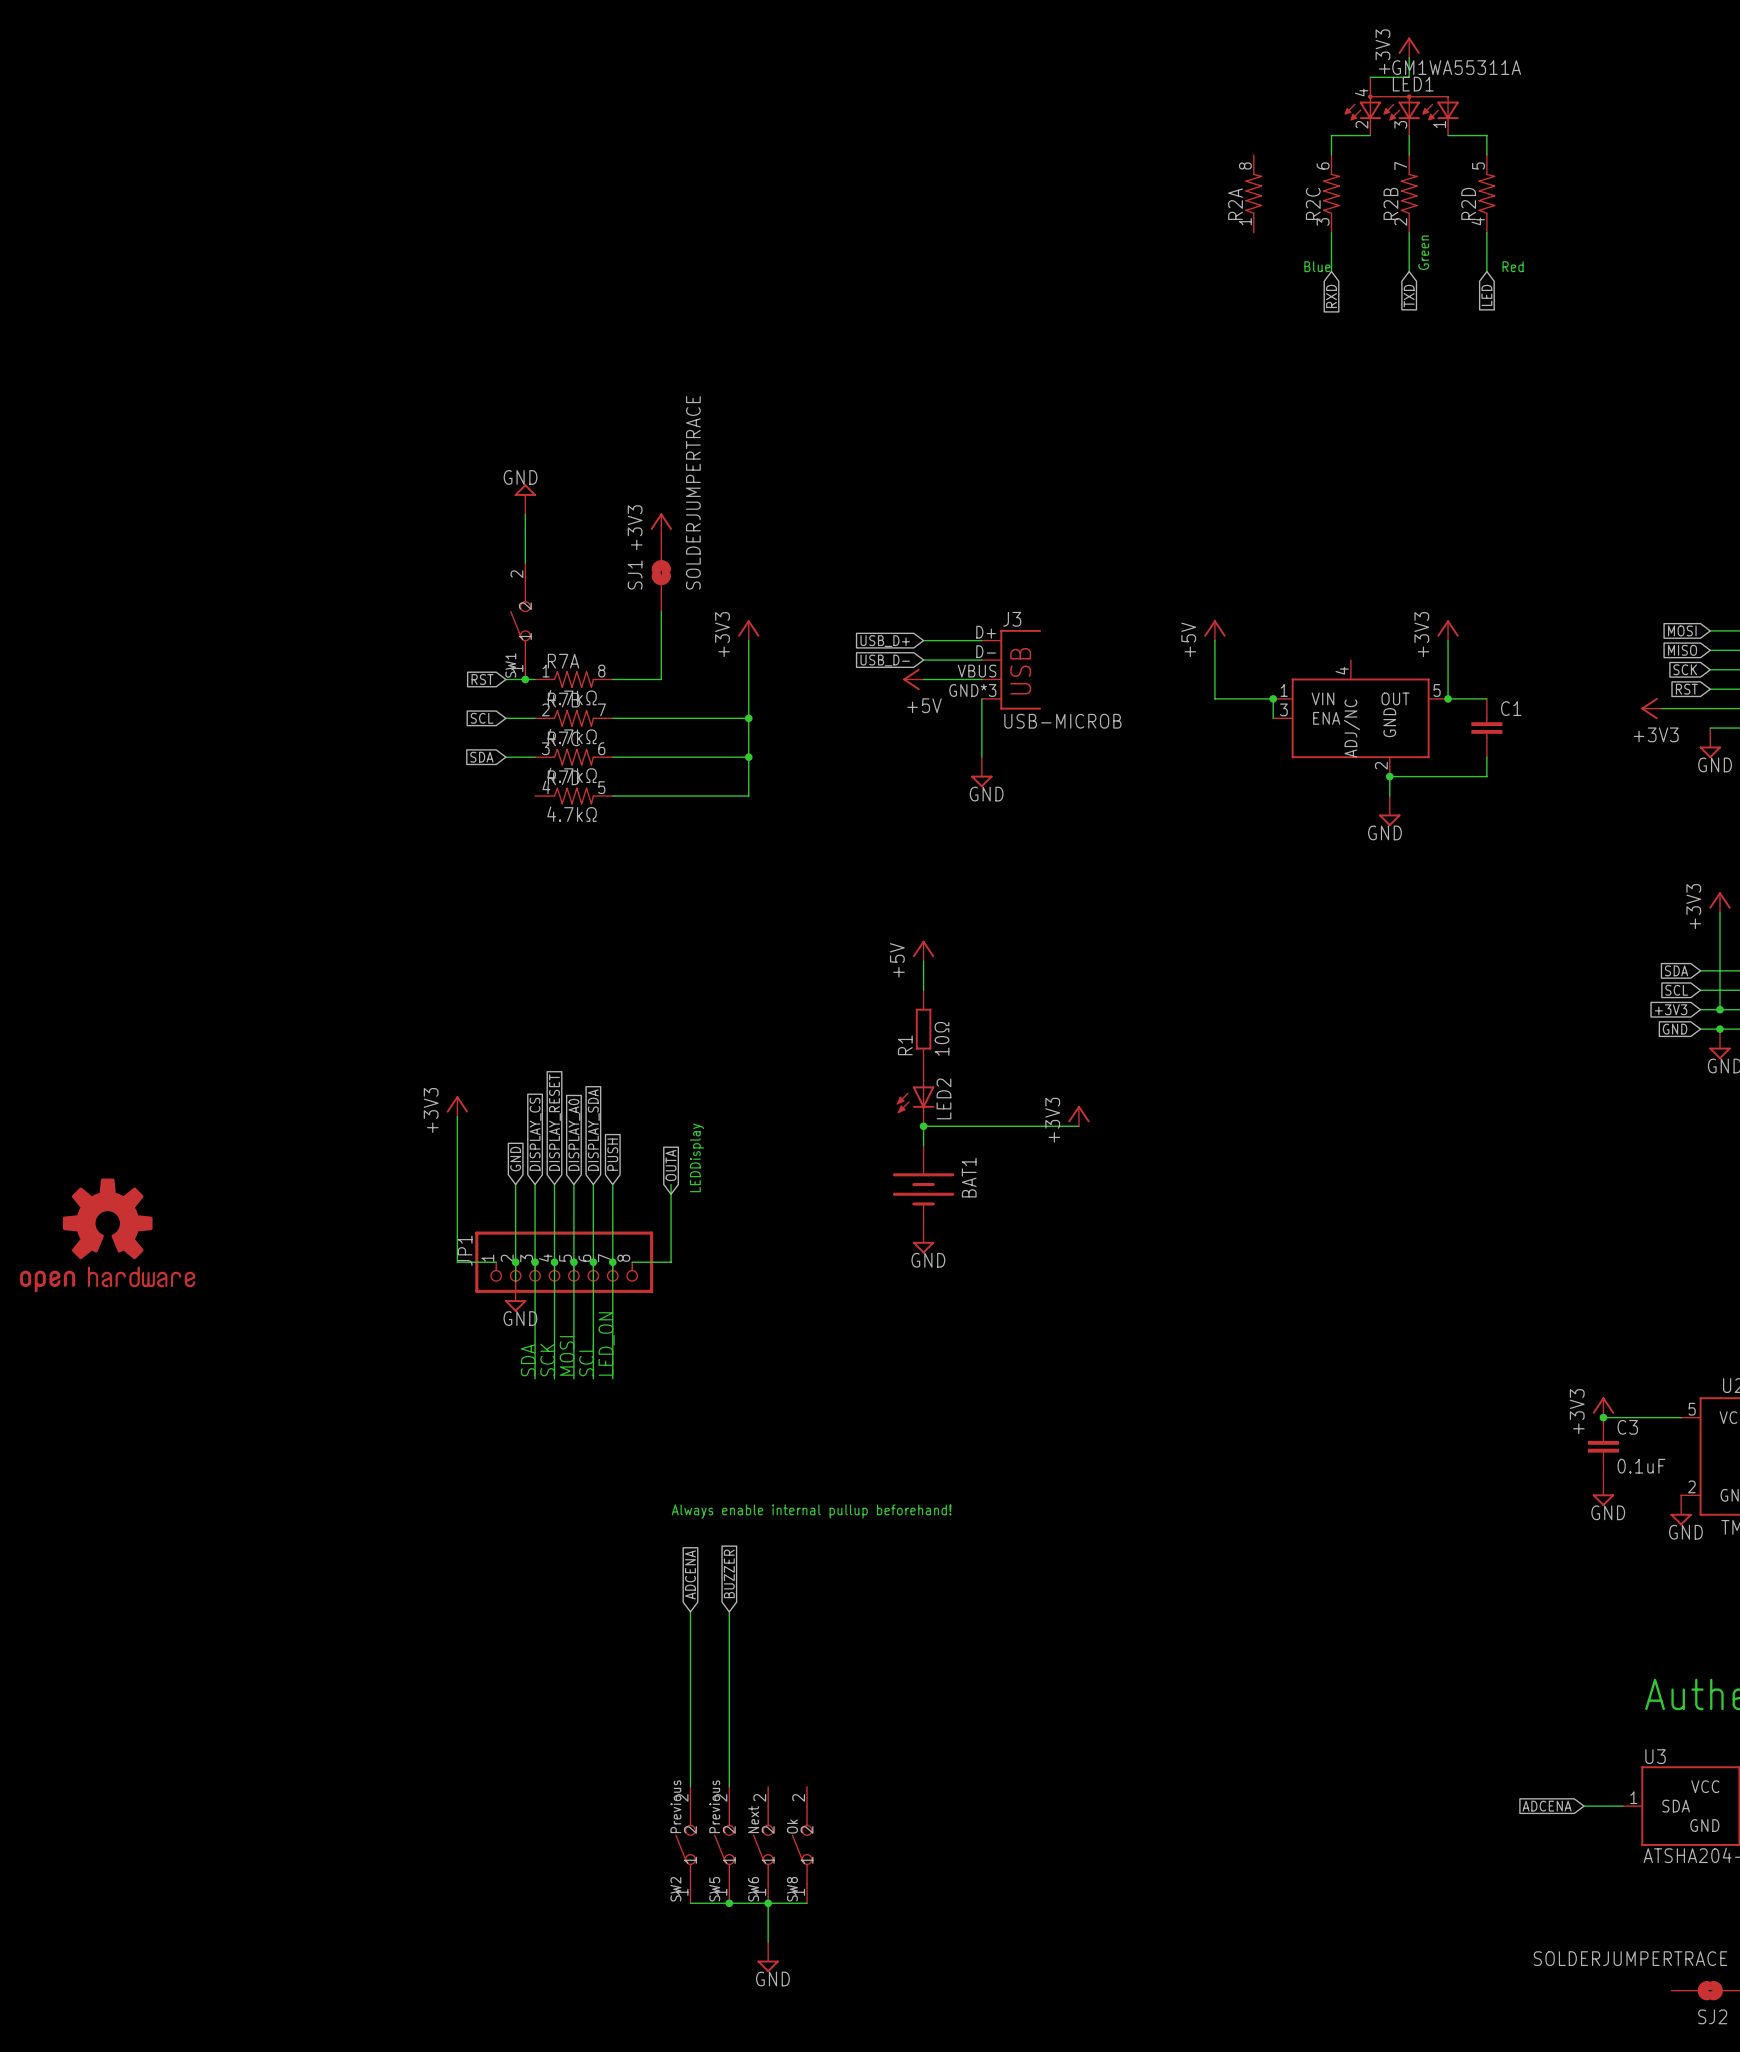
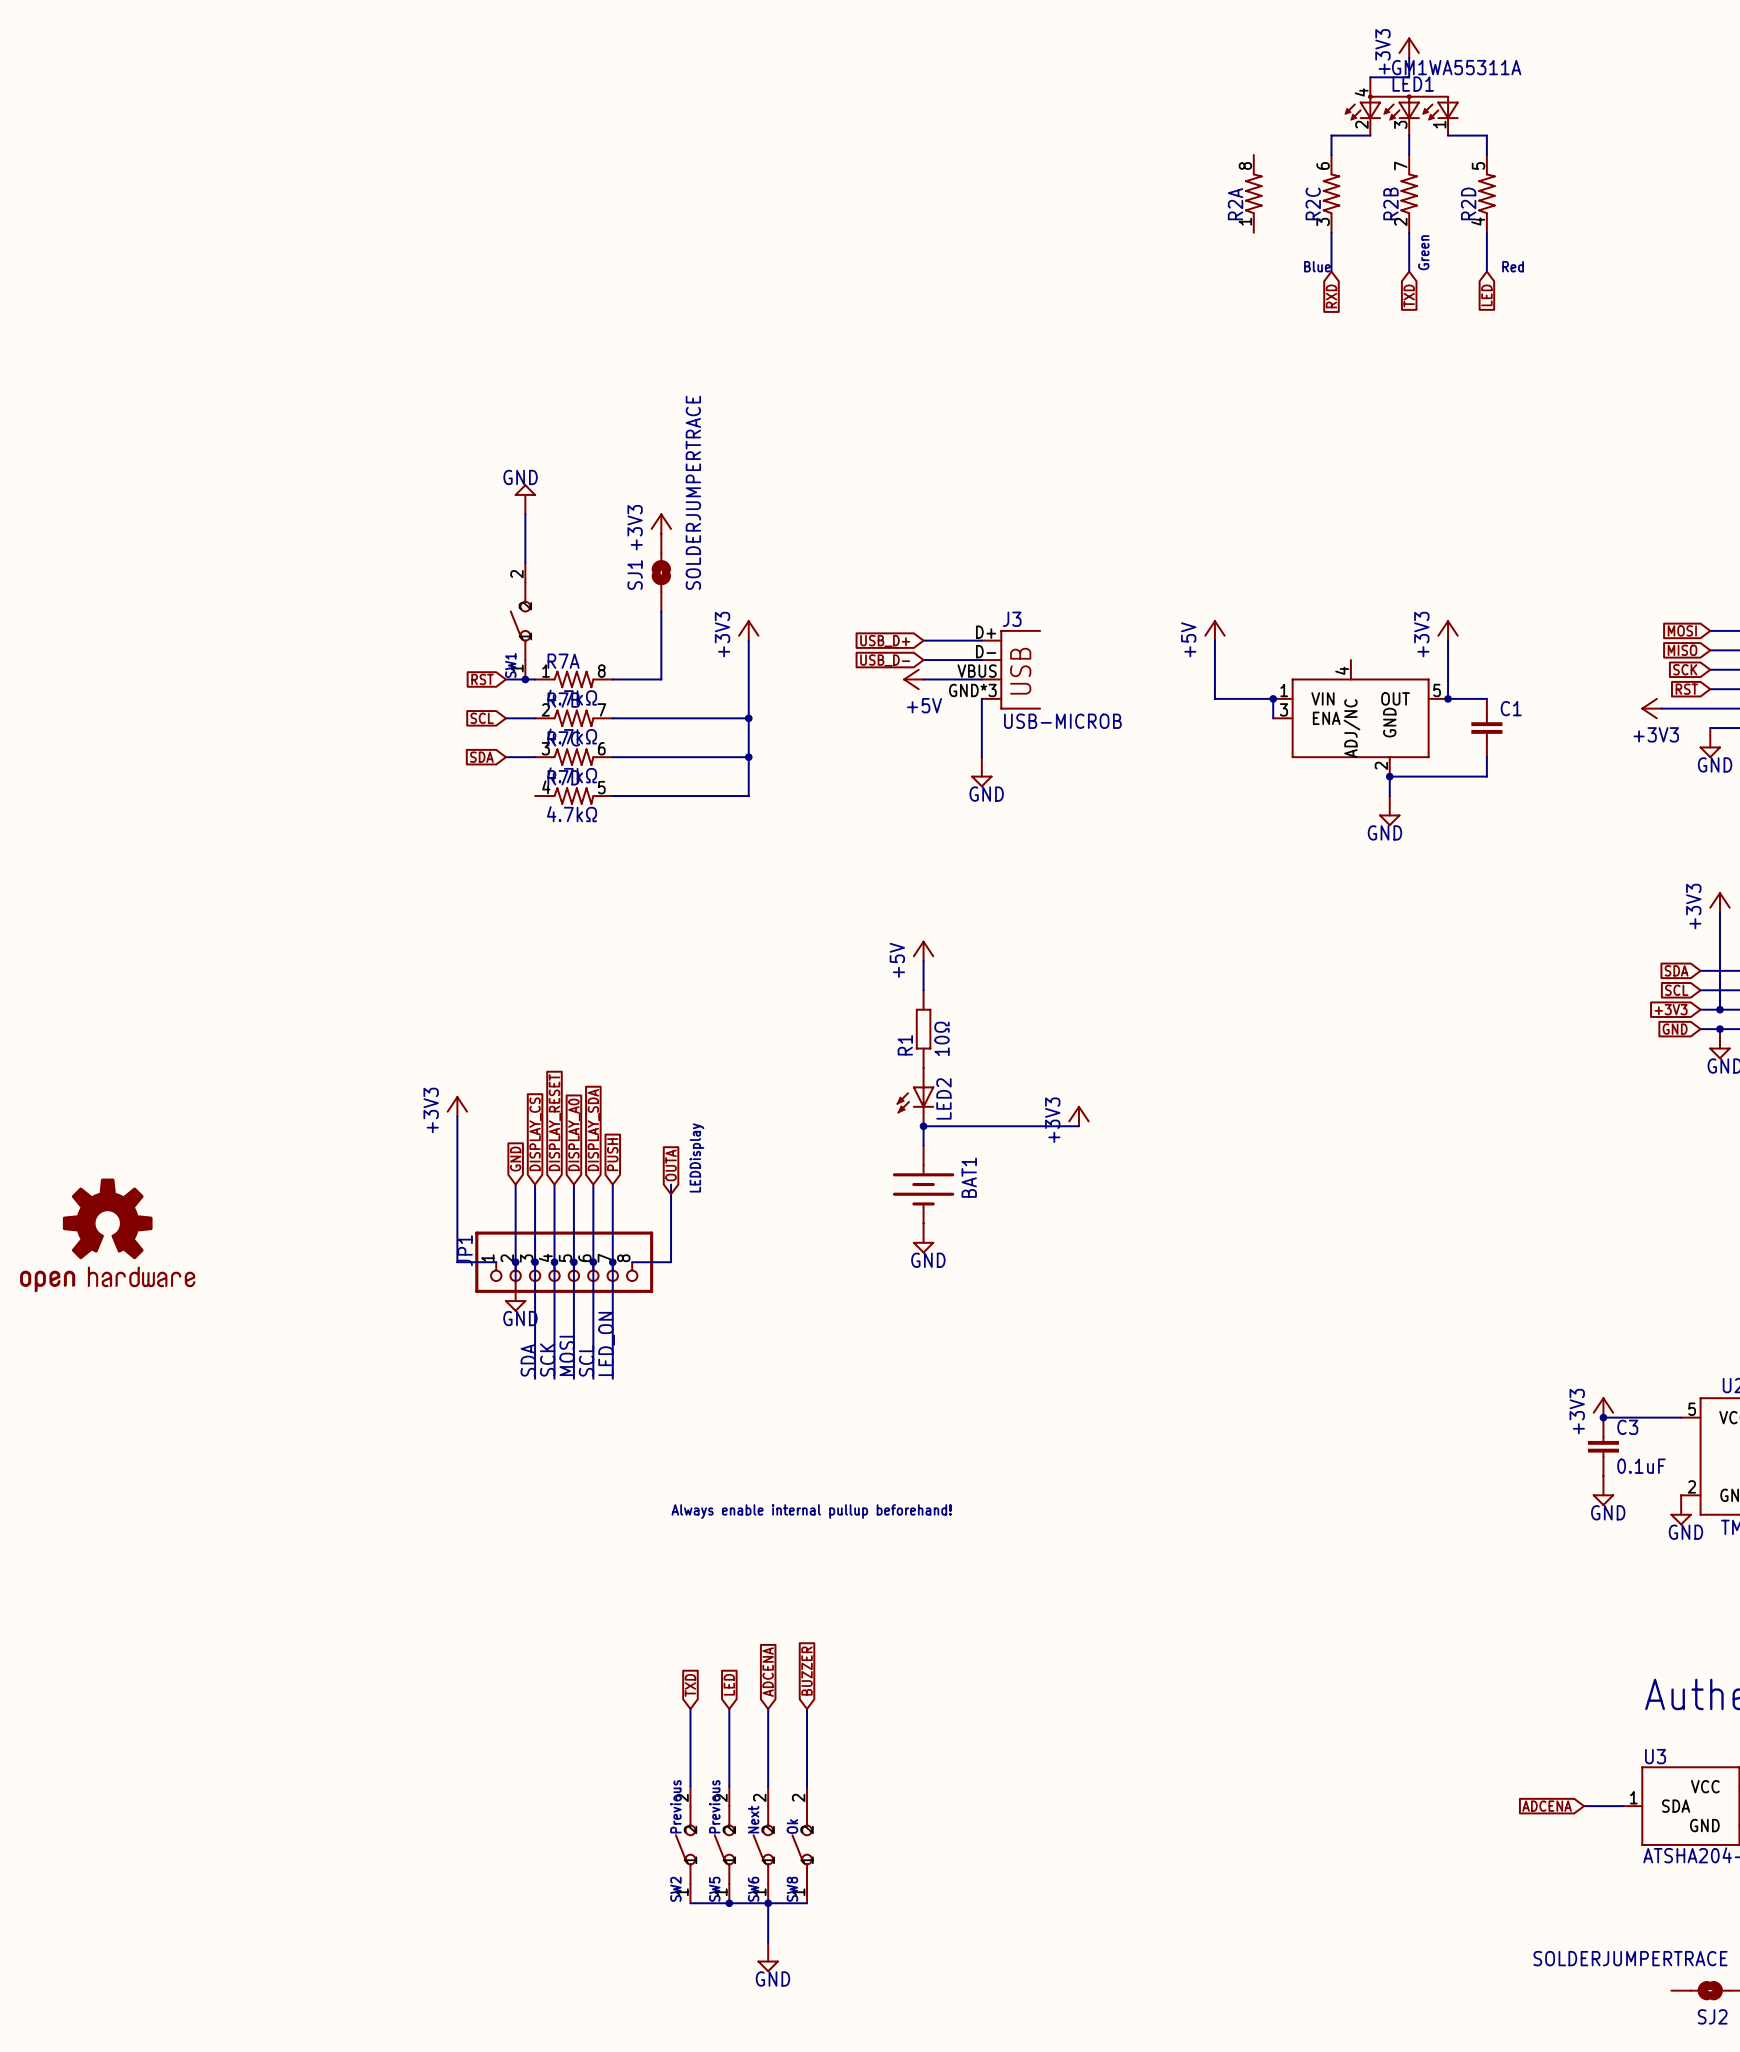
global label position: BUZZER (729, 1573) -> BUZZER (807, 1671)
global label position: ADCENA (690, 1574) -> ADCENA (768, 1672)
wire: (690, 1611) (690, 1709) -> none
wire: (729, 1611) (729, 1709) -> none
global label: none -> LED (729, 1684)
global label: none -> TXD (690, 1685)
wire: none -> (768, 1709) (768, 1786)
wire: none -> (807, 1709) (807, 1786)

